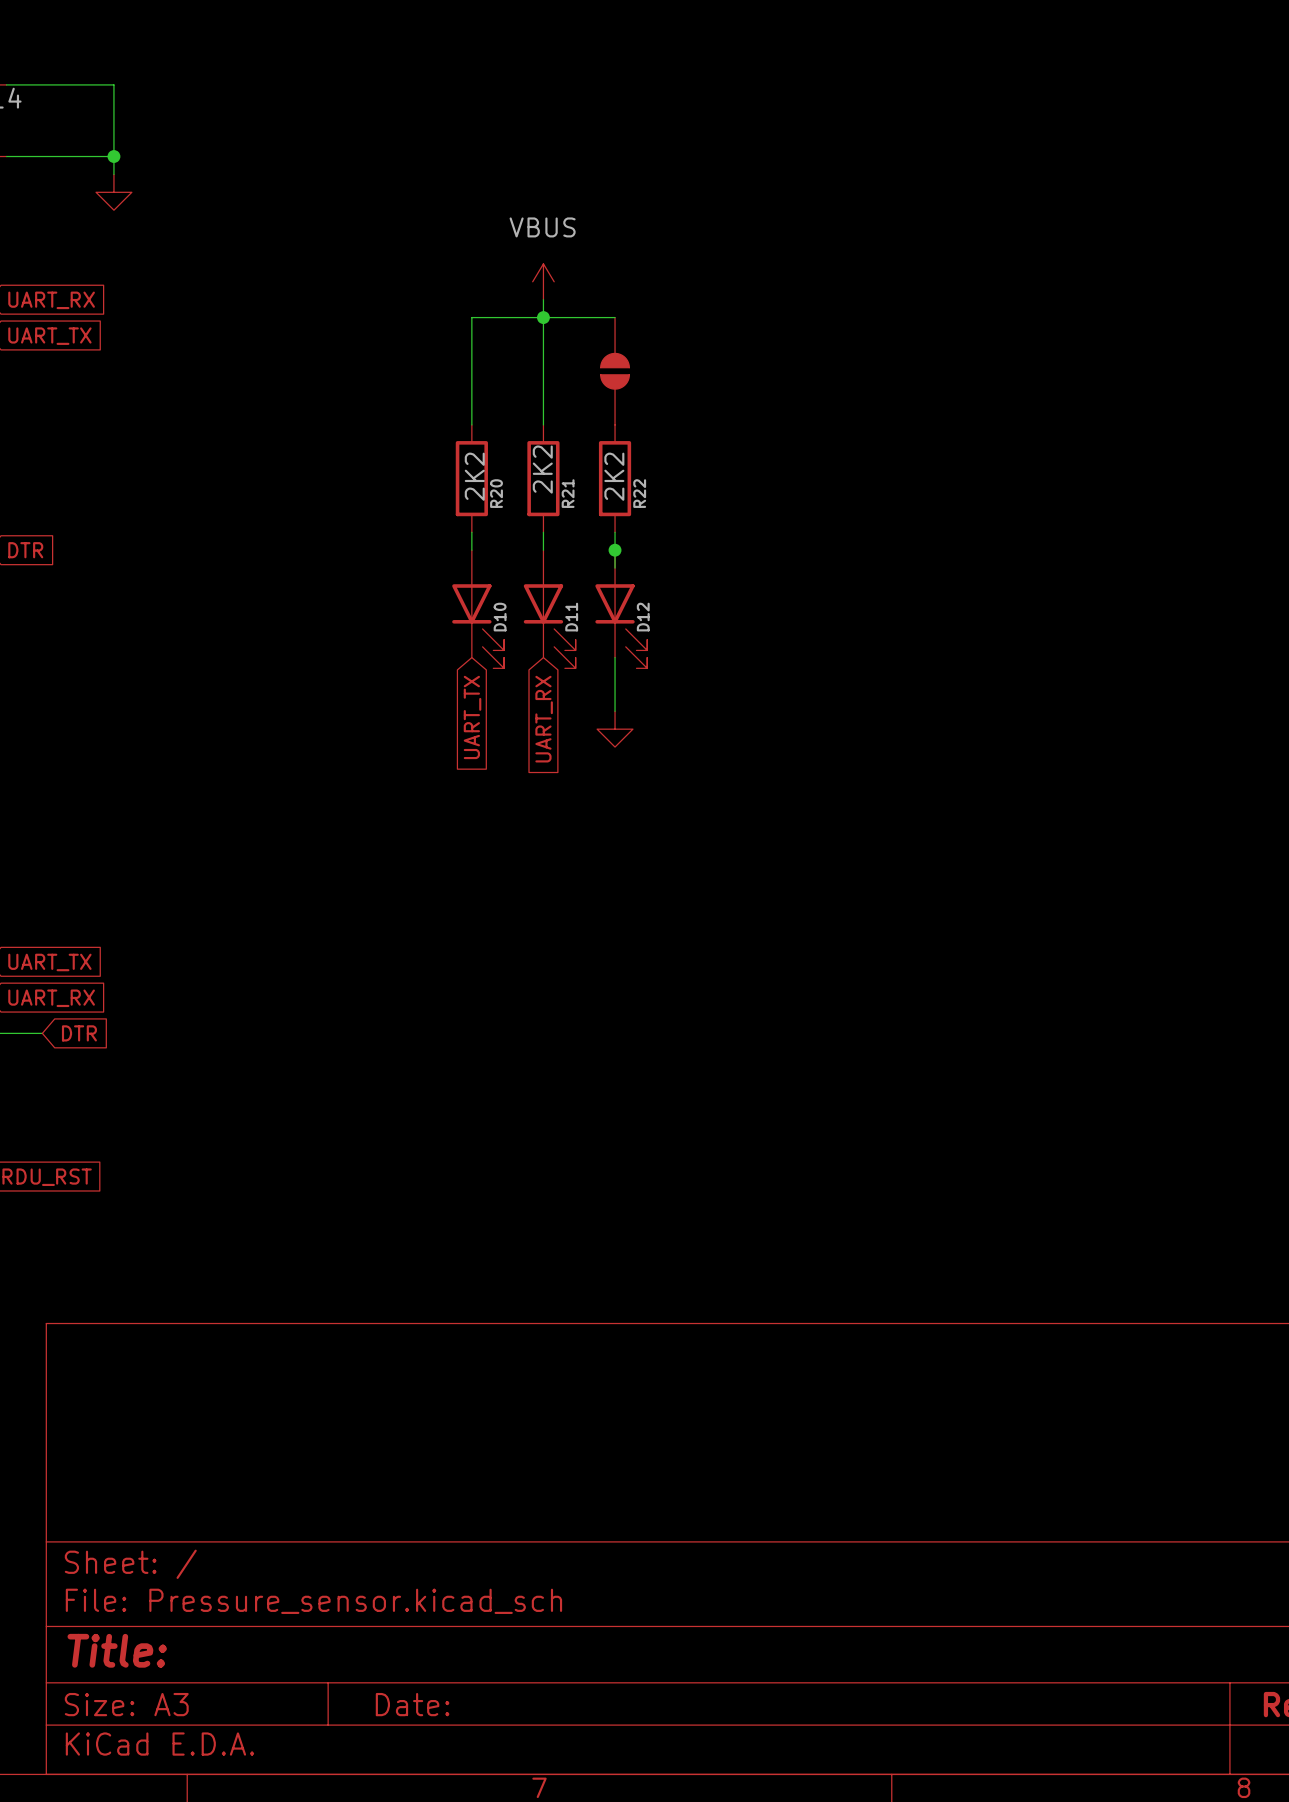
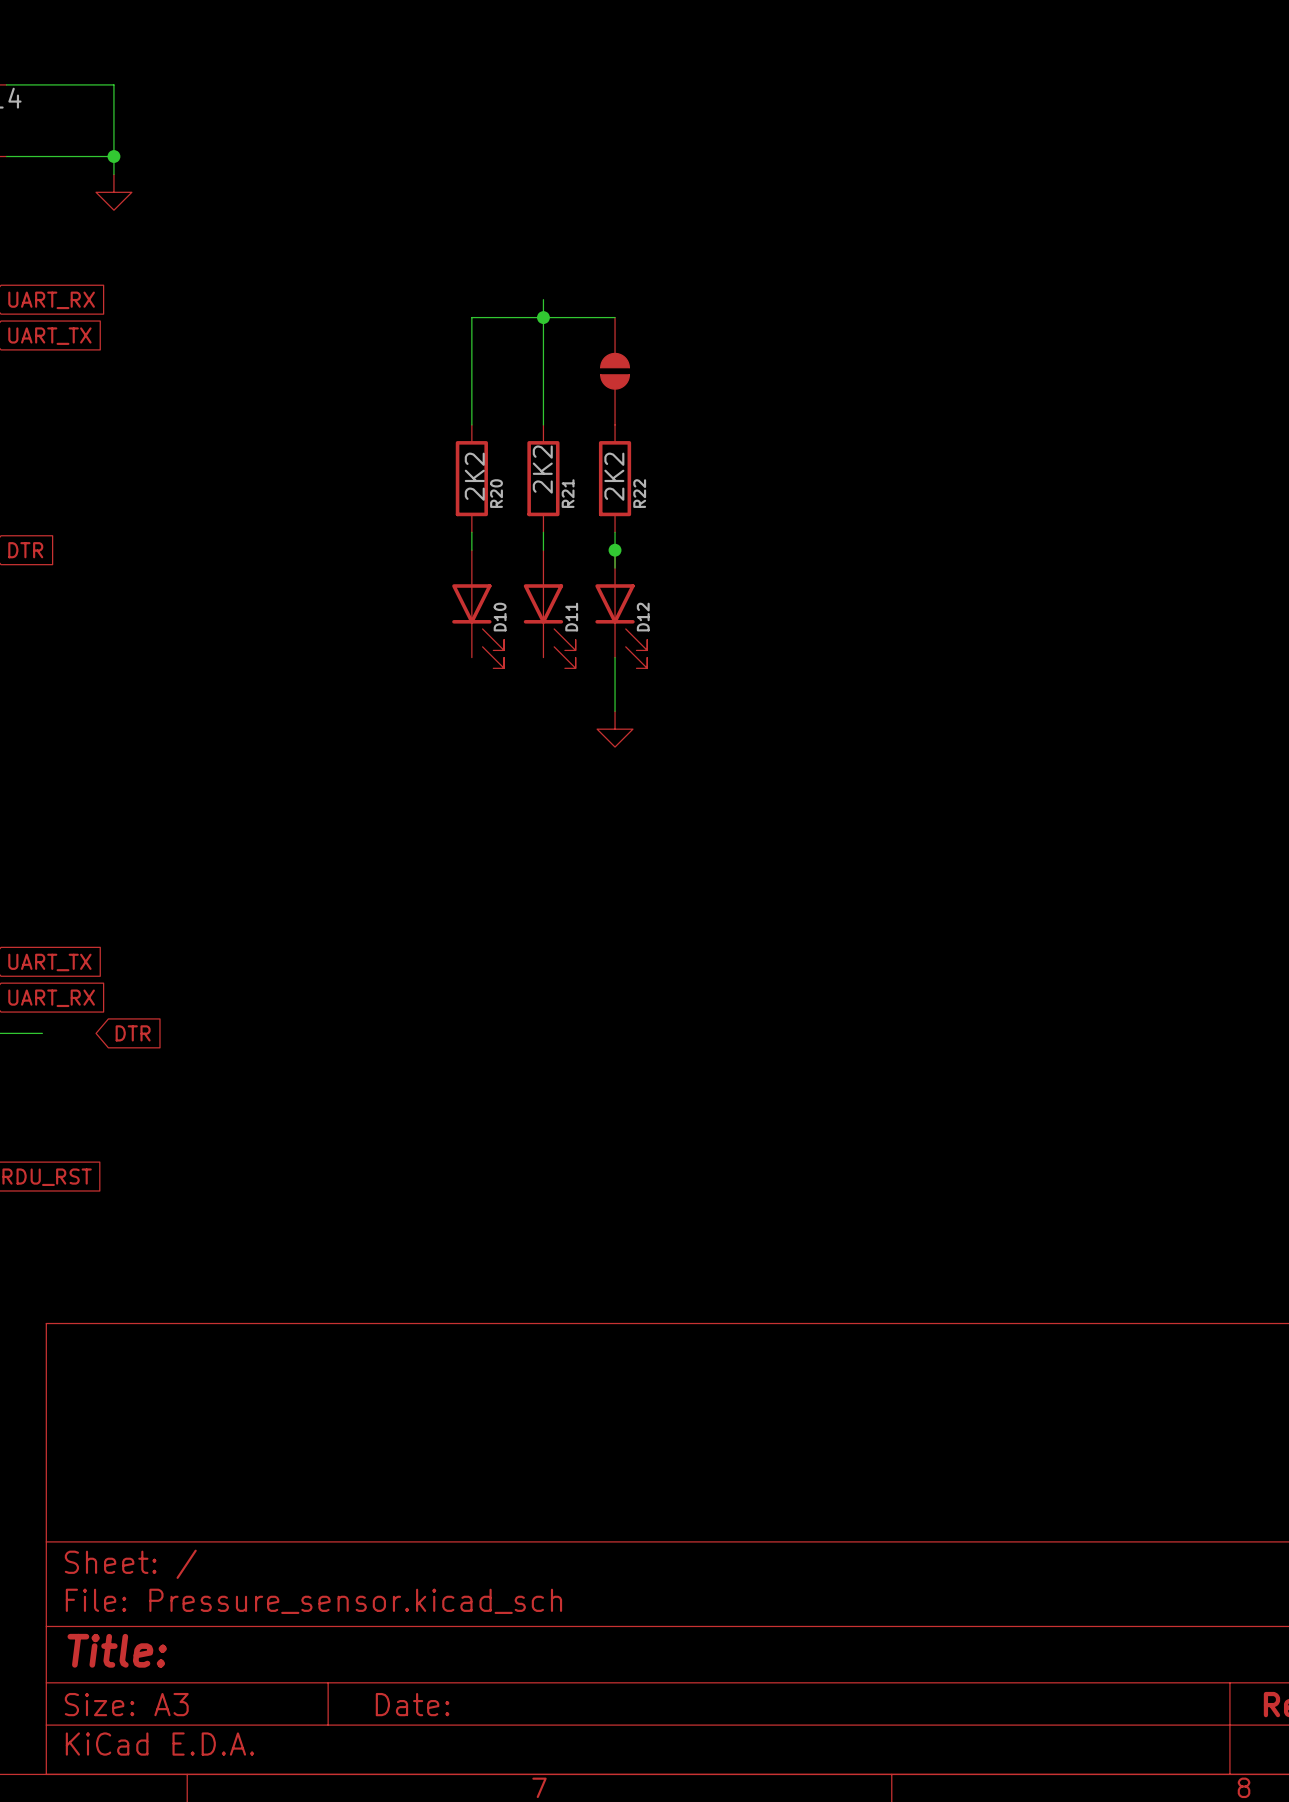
power symbol: VBUS (543, 281) -> none
global label: UART_TX (472, 717) -> none
global label: UART_RX (544, 719) -> none
global label position: DTR (79, 1033) -> DTR (133, 1033)

